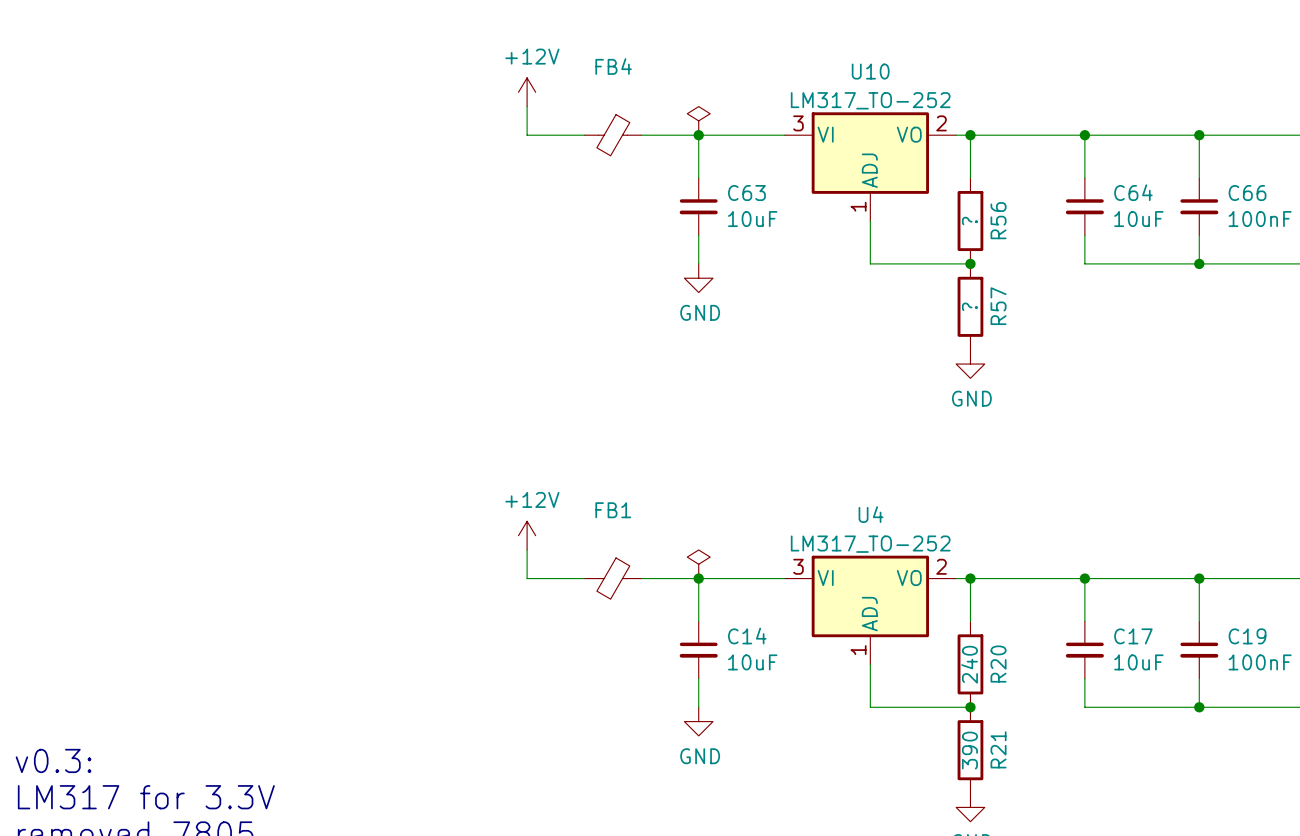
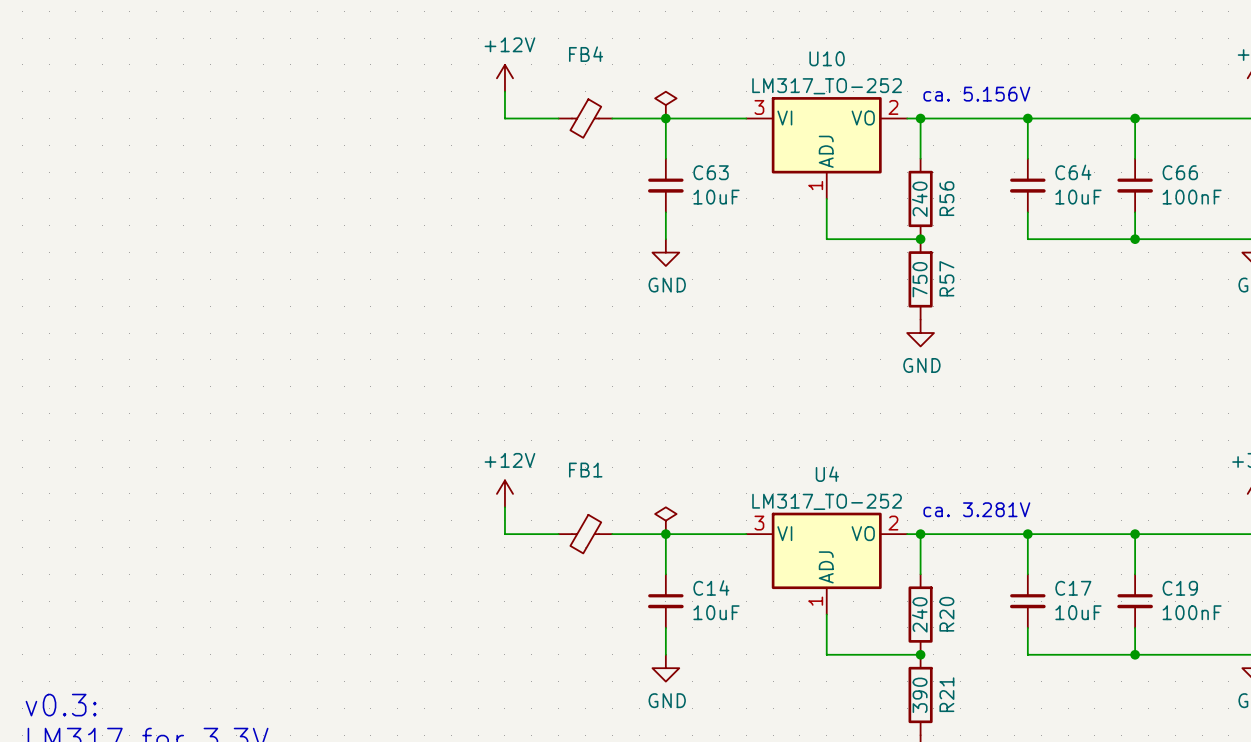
text: none -> ca. 5.156V (976, 94)
R56 value: ? (969, 221) -> 240 (919, 199)
R57 value: ? (969, 306) -> 750 (920, 279)
text: none -> ca. 3.281V (976, 509)

